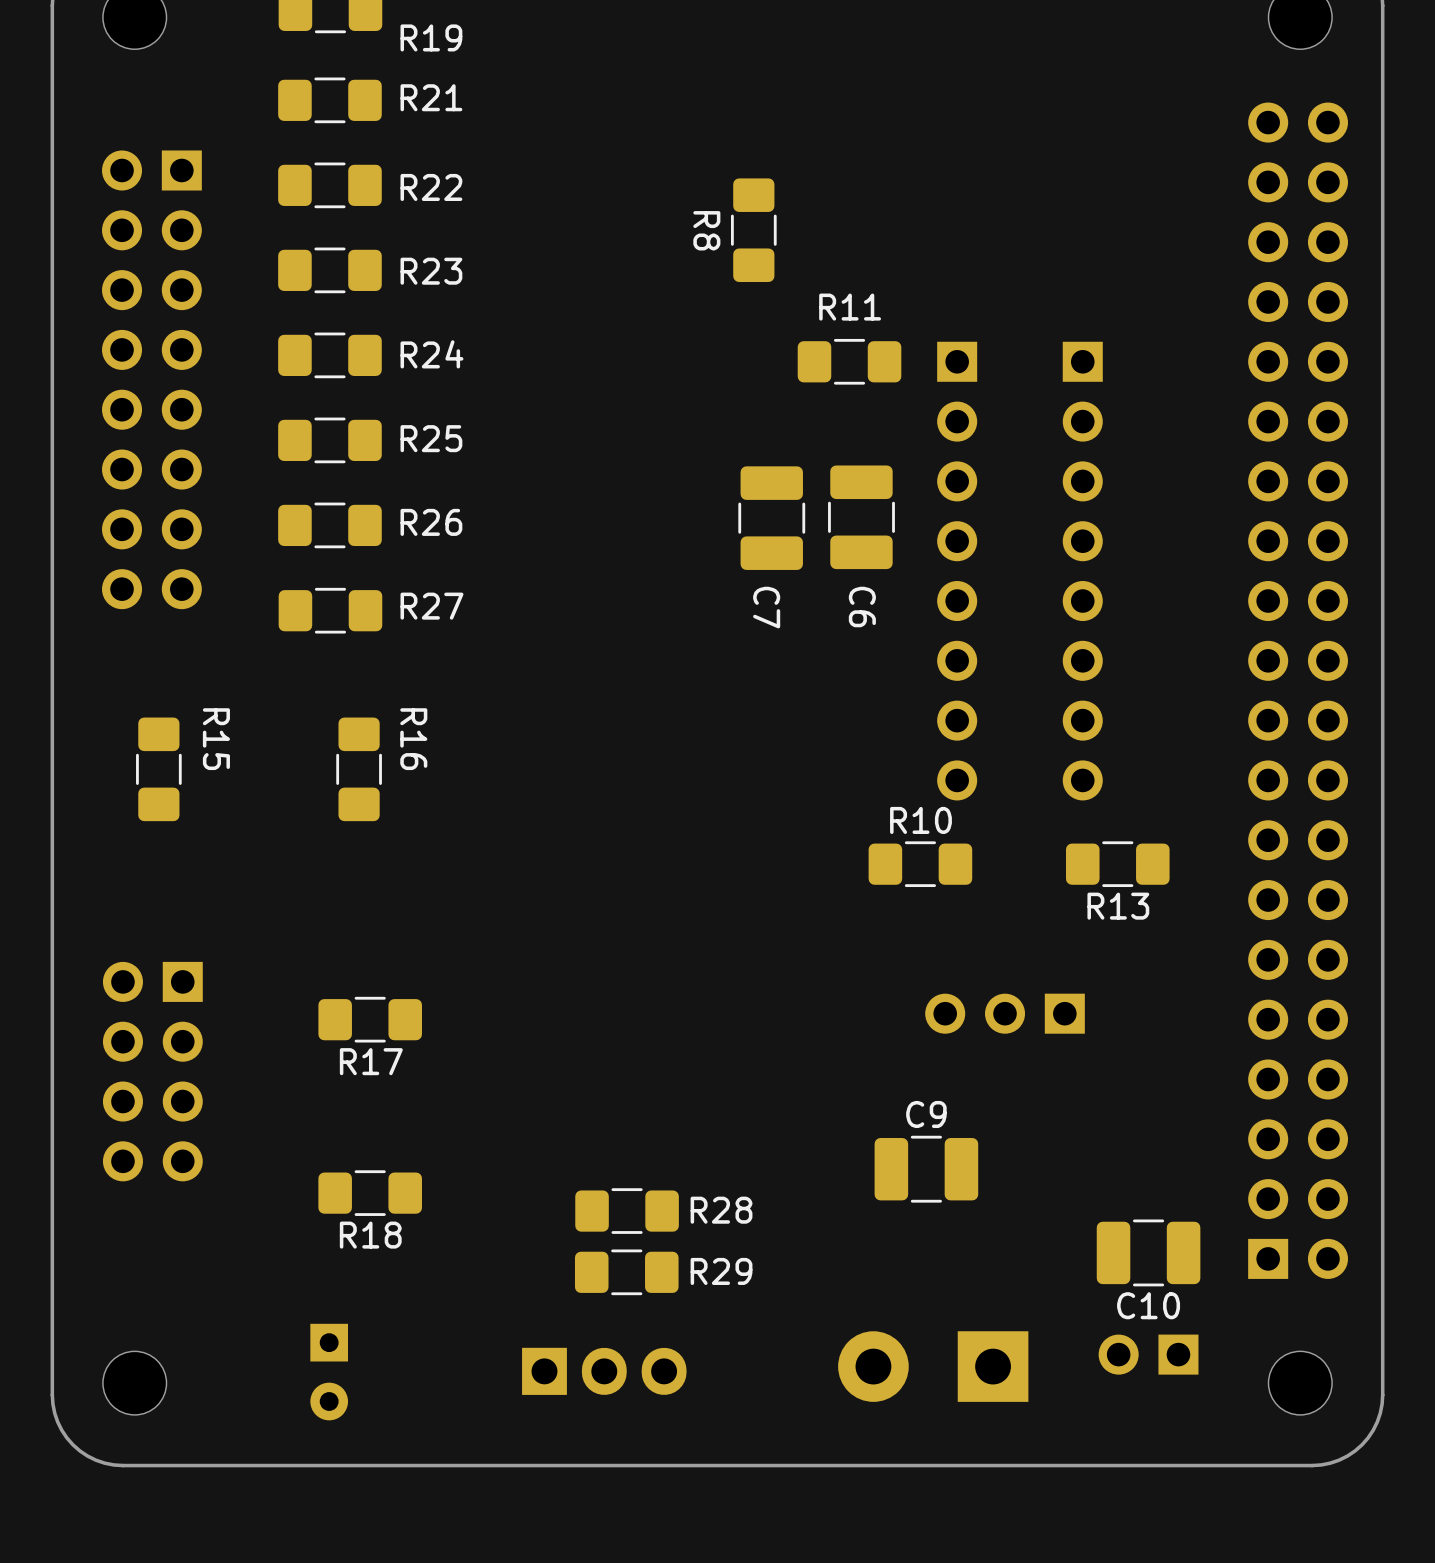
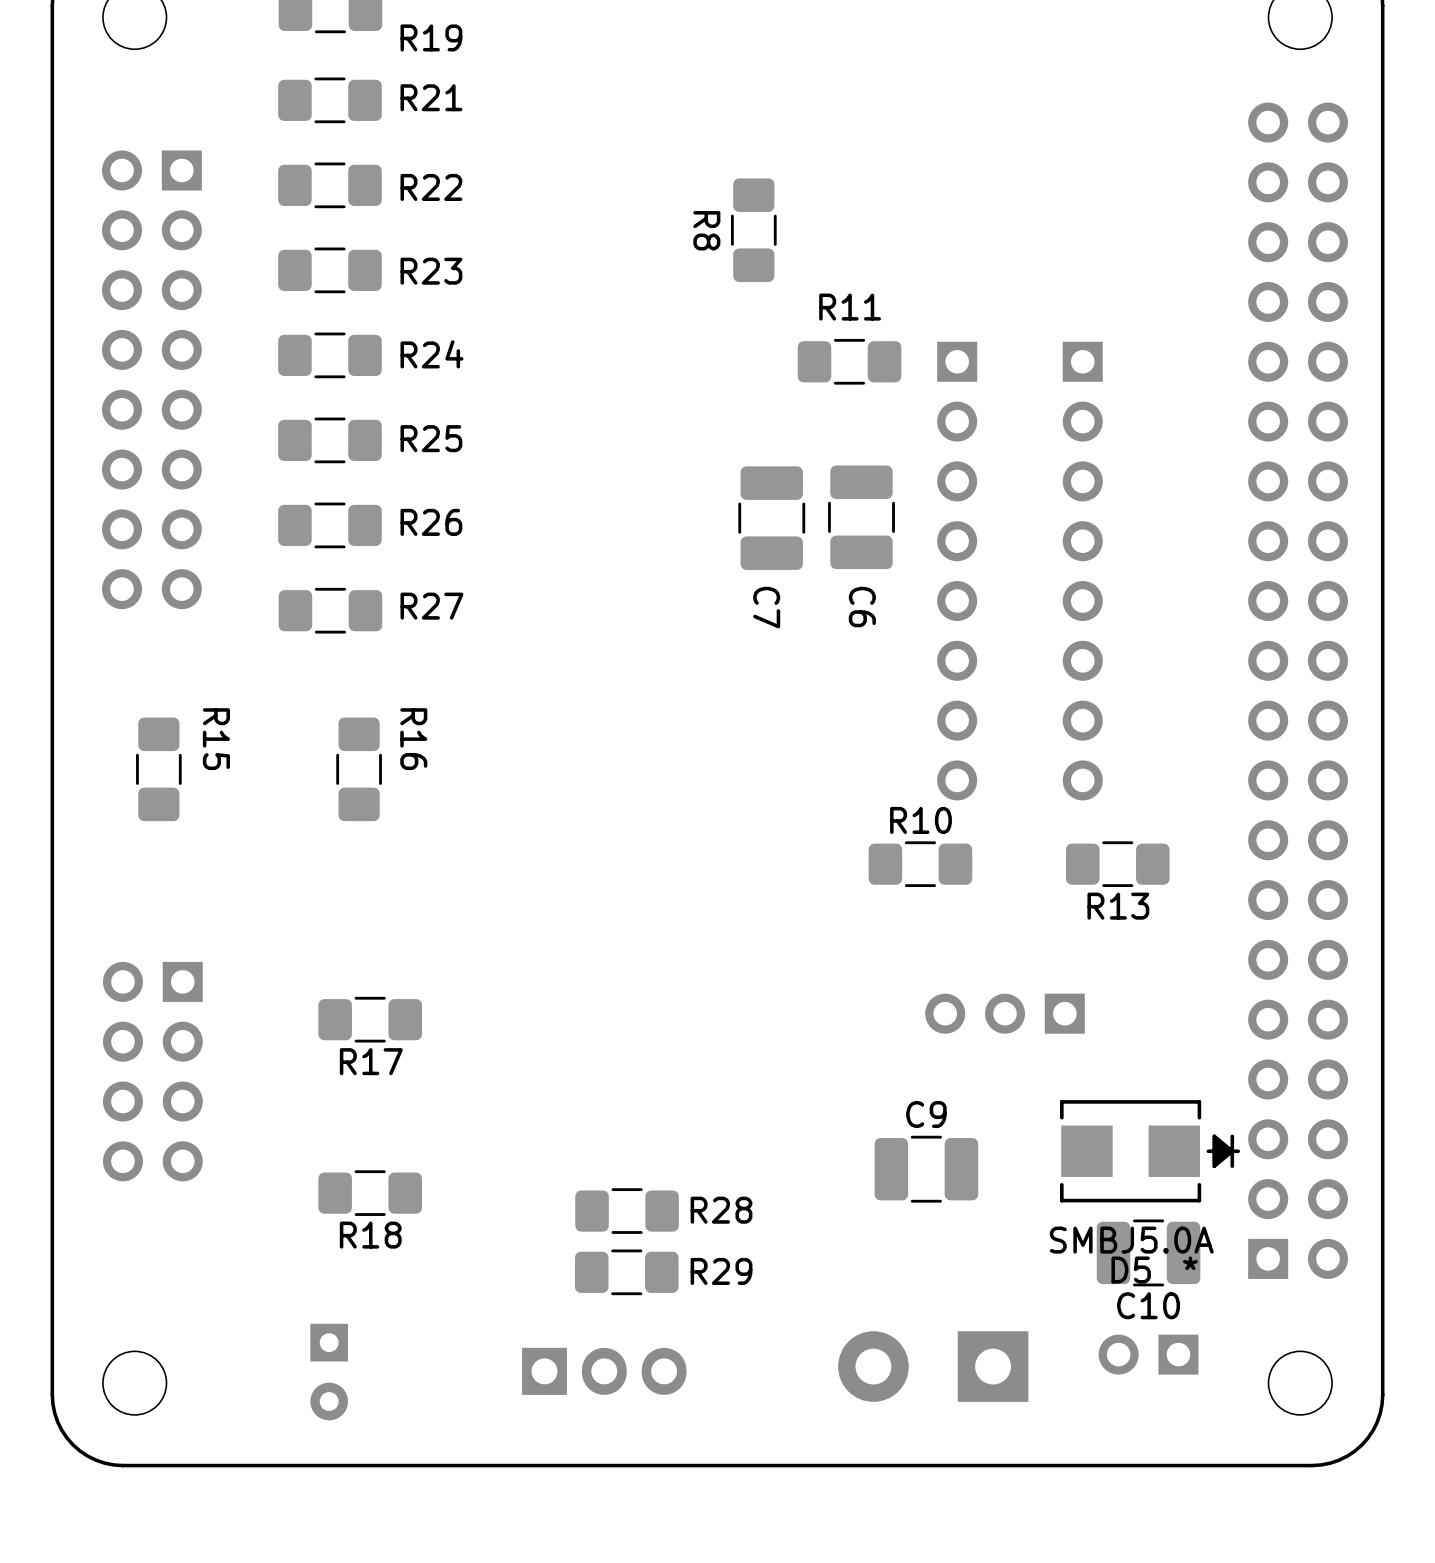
D5: none -> SMBJ5.0A (1150, 1151)

